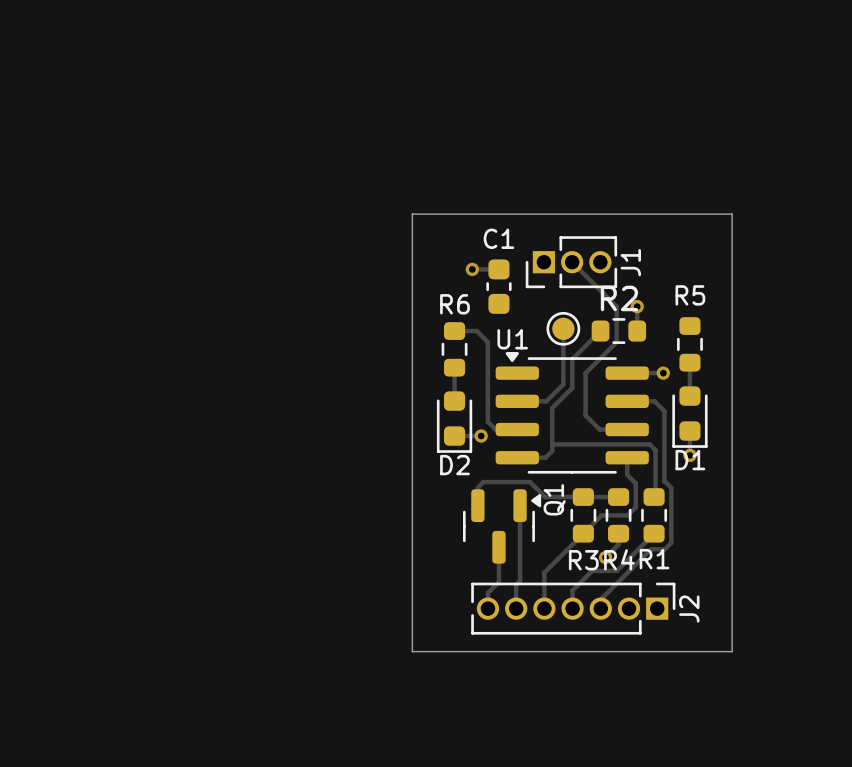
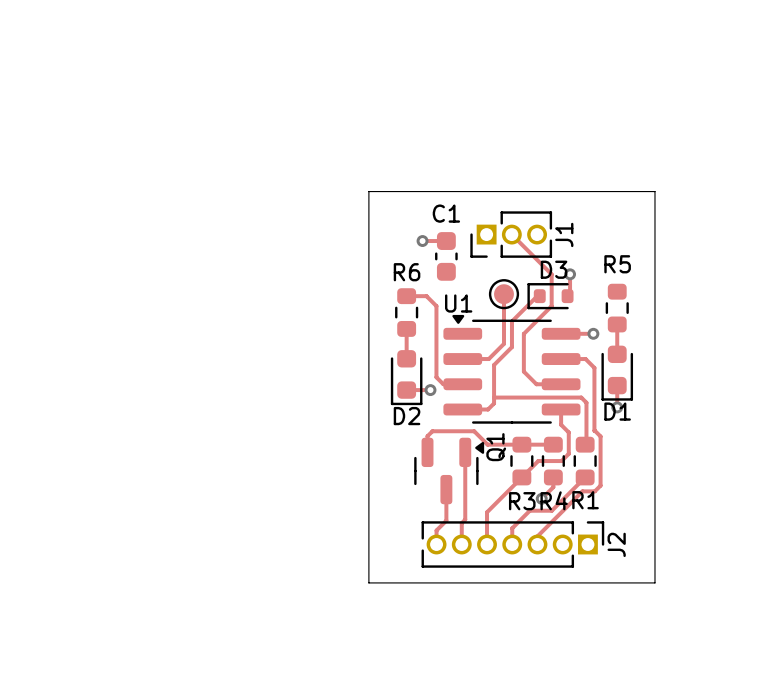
D3: none -> (550, 296)
R2: (618, 331) -> none

